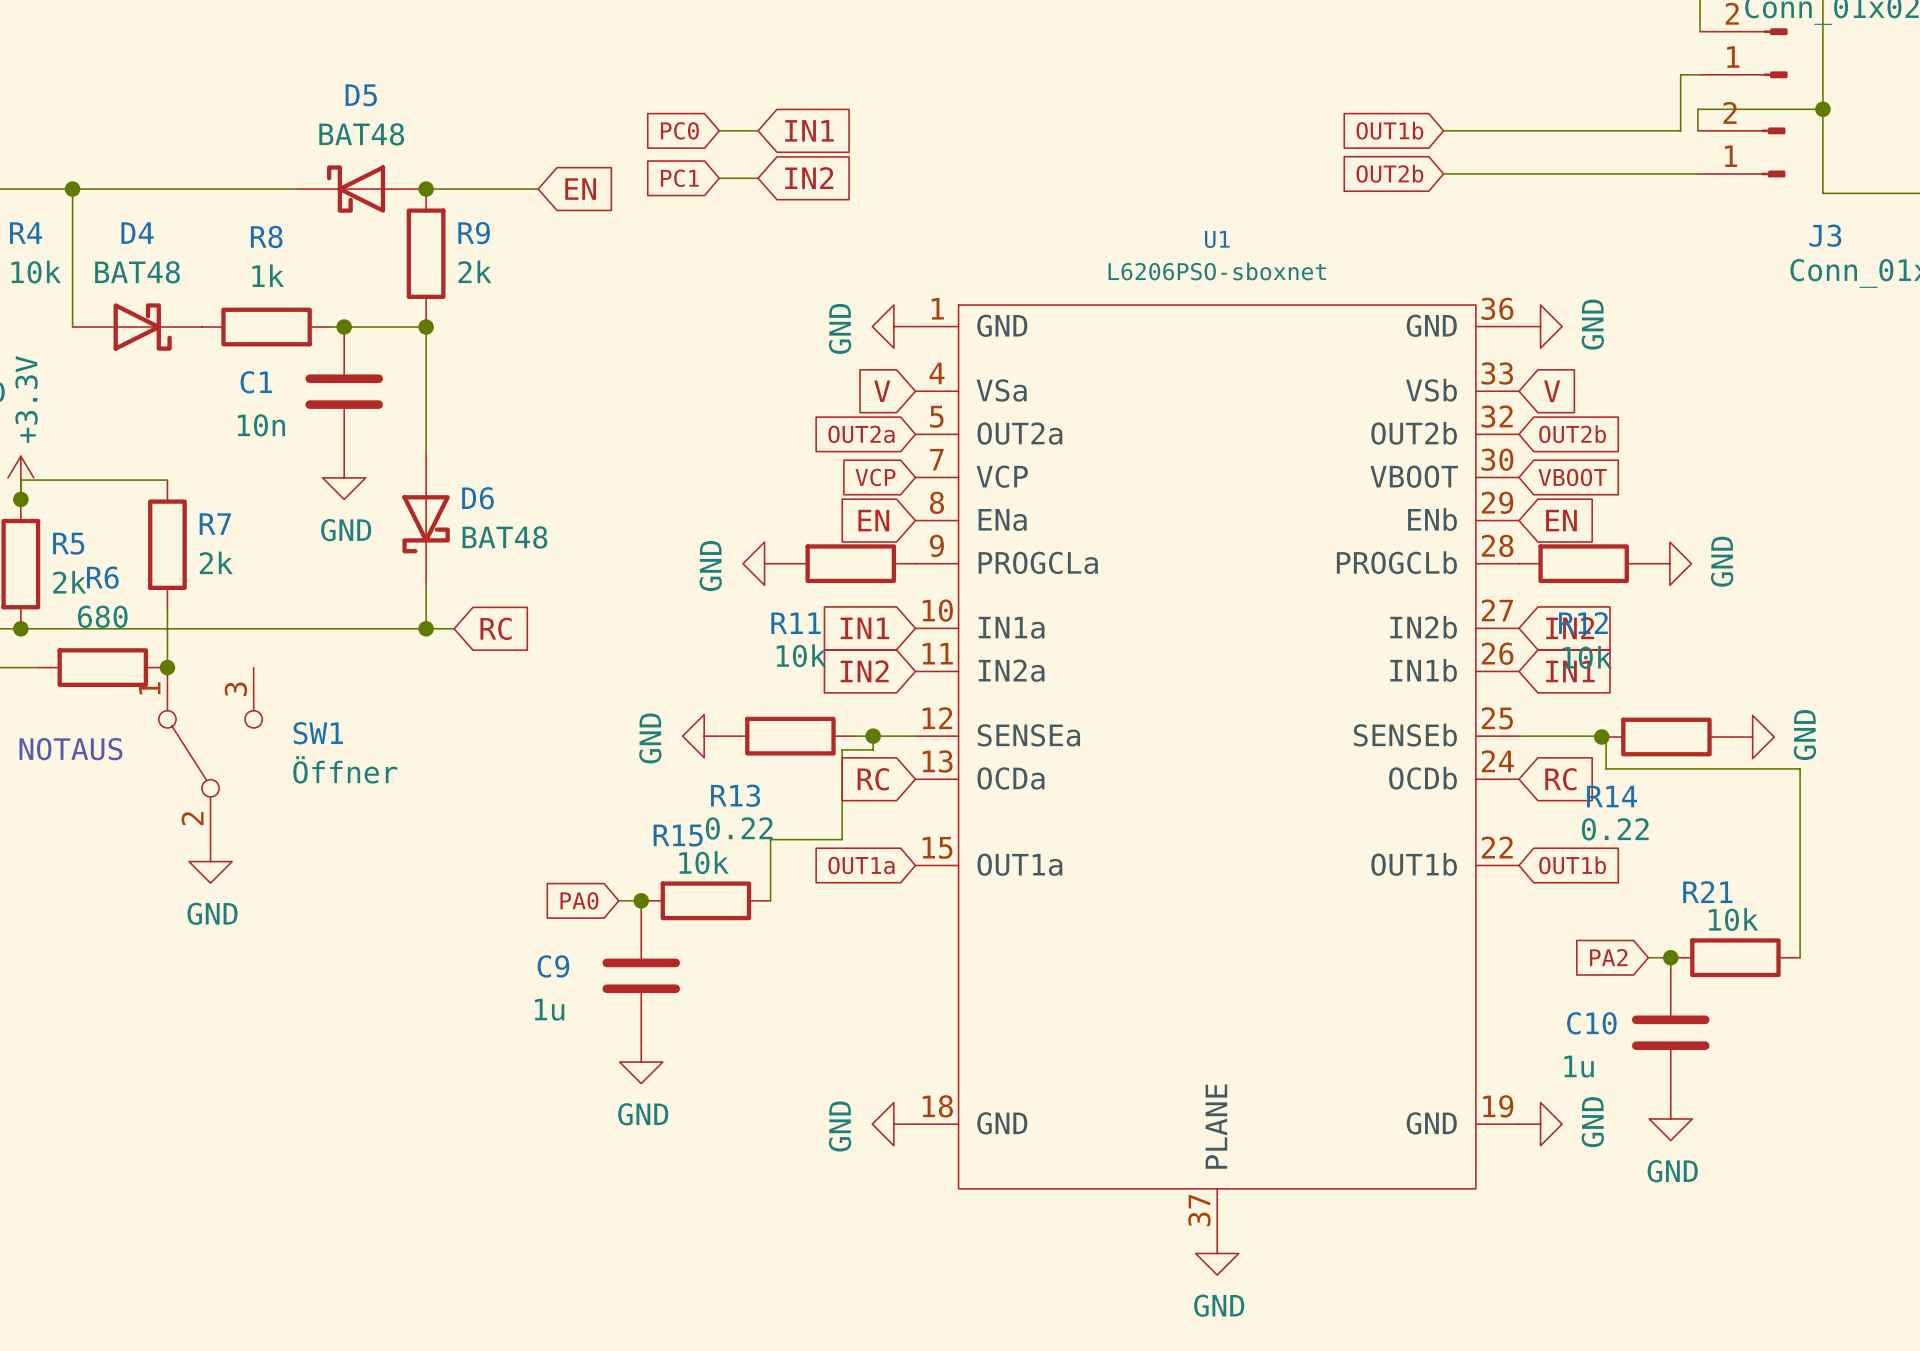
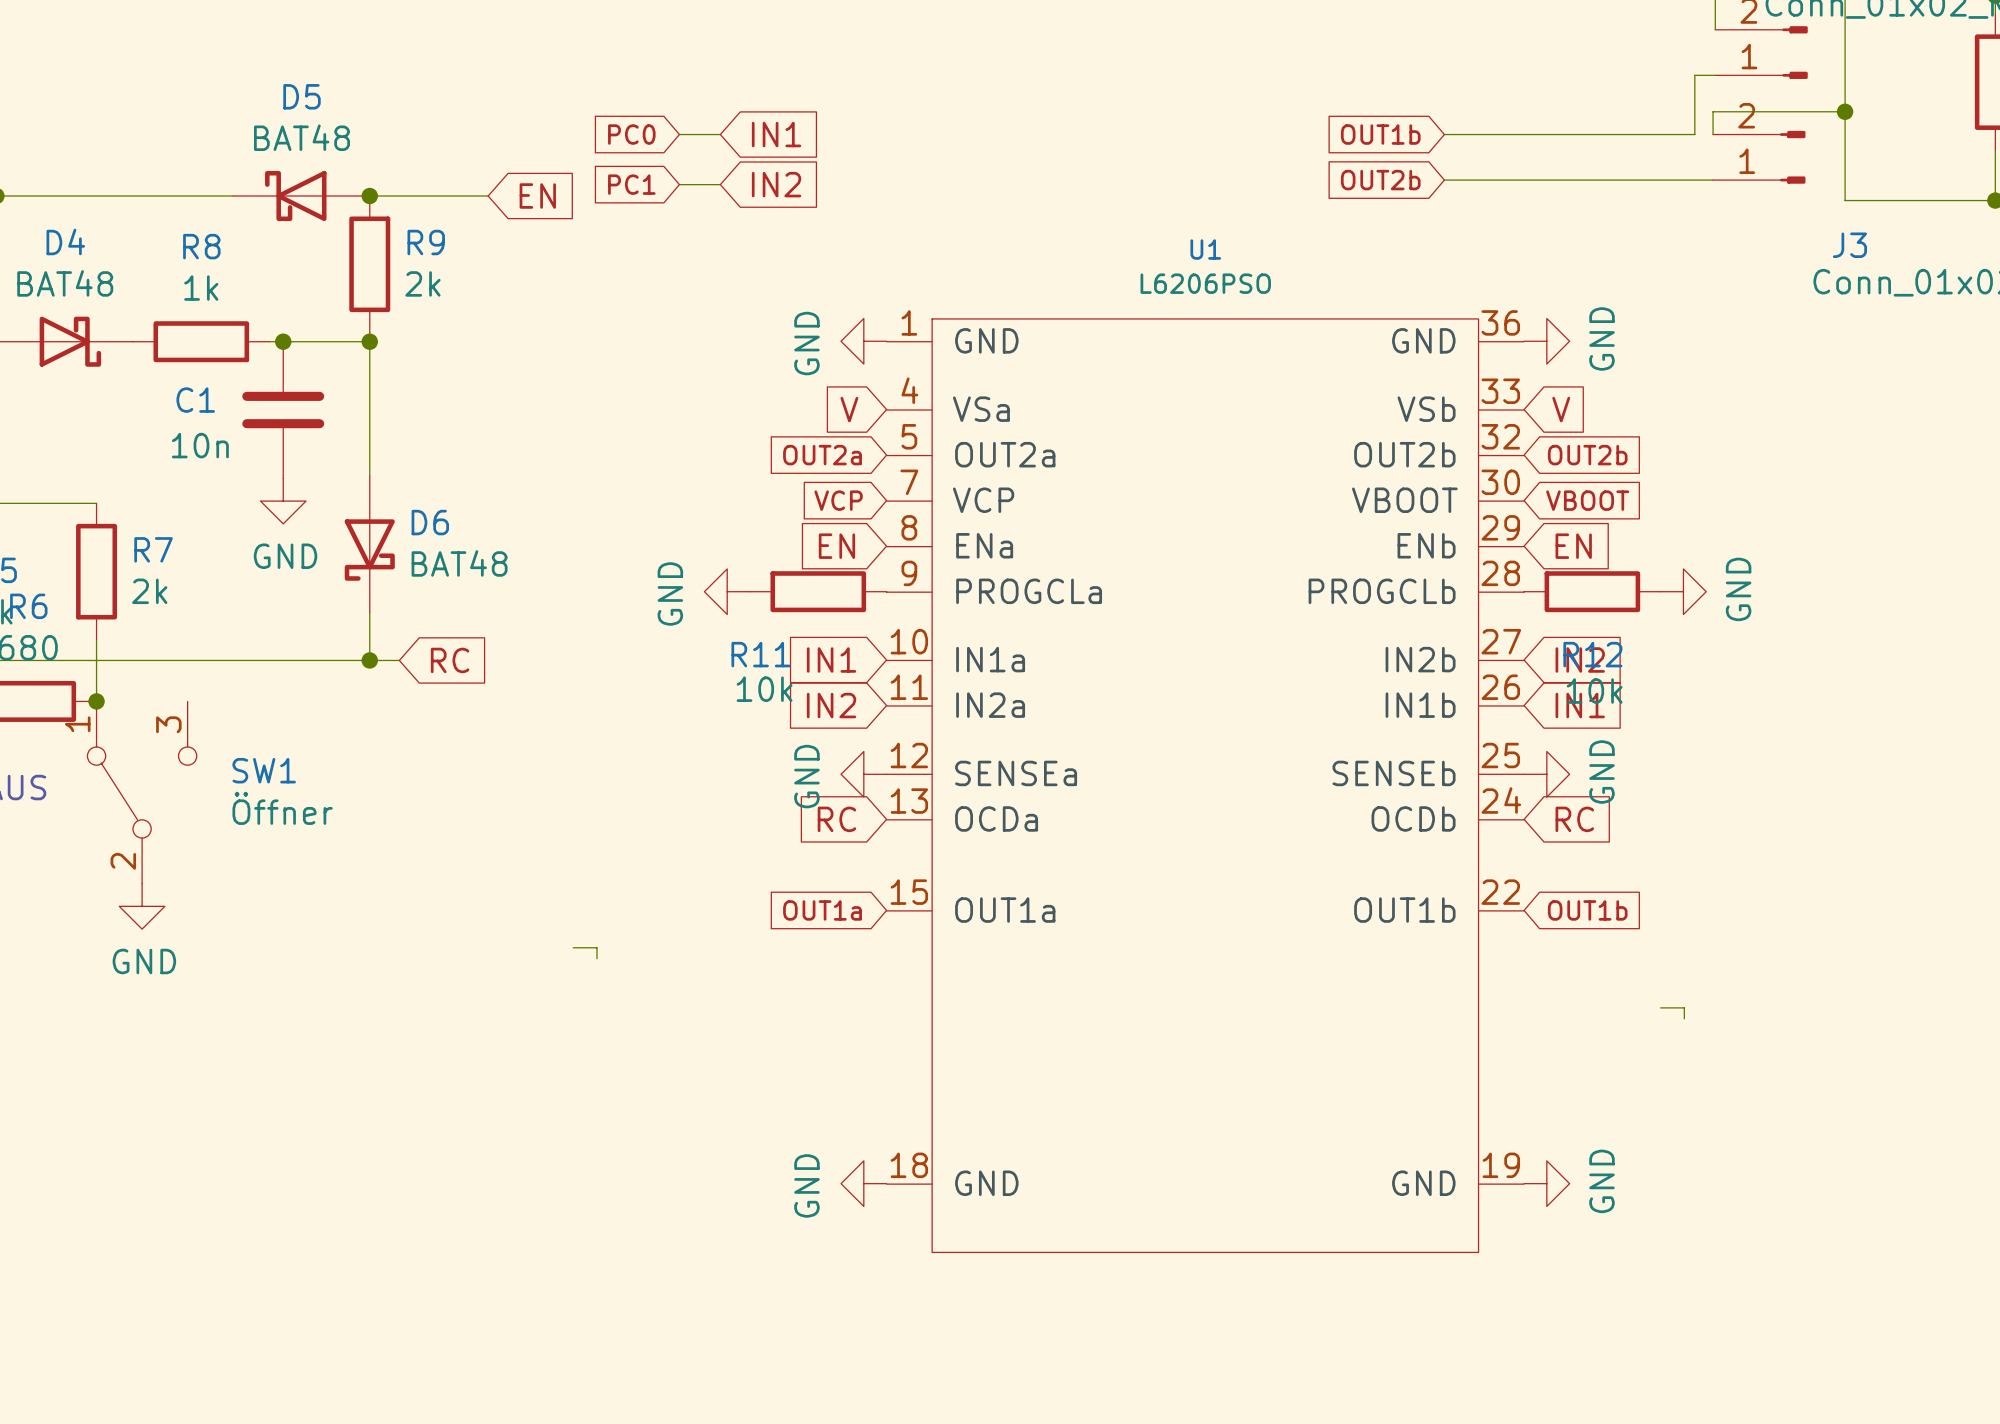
U1 value: L6206PSO-sboxnet (1217, 271) -> L6206PSO (1205, 283)
U1 symbol: [915, 305, 1520, 1232] -> [886, 318, 1525, 1253]
power symbol position: GND (704, 736) -> GND (863, 774)
R13: 0.22 (790, 736) -> none
wire: (855, 736) (915, 736) -> none
wire: (873, 736) (873, 749) (842, 749) (842, 839) (770, 839) (770, 900) -> none
junction: (873, 736) -> none
wire: (1519, 736) (1606, 737) (1606, 768) (1800, 768) (1800, 957) -> none
power symbol: none -> GND (1546, 774)
junction: (1601, 737) -> none
R14: 0.22 (1666, 737) -> none
power symbol: GND (1752, 737) -> none
global label: PA0 (579, 900) -> none
junction: (641, 900) -> none
R15: 10k (705, 900) -> none
global label: PA2 (1608, 957) -> none
junction: (1670, 957) -> none
R21: 10k (1735, 957) -> none
C9: 1u (641, 975) -> none
C10: 1u (1670, 1032) -> none
power symbol: GND (641, 1062) -> none
power symbol: GND (1670, 1118) -> none
power symbol: GND (1217, 1253) -> none

